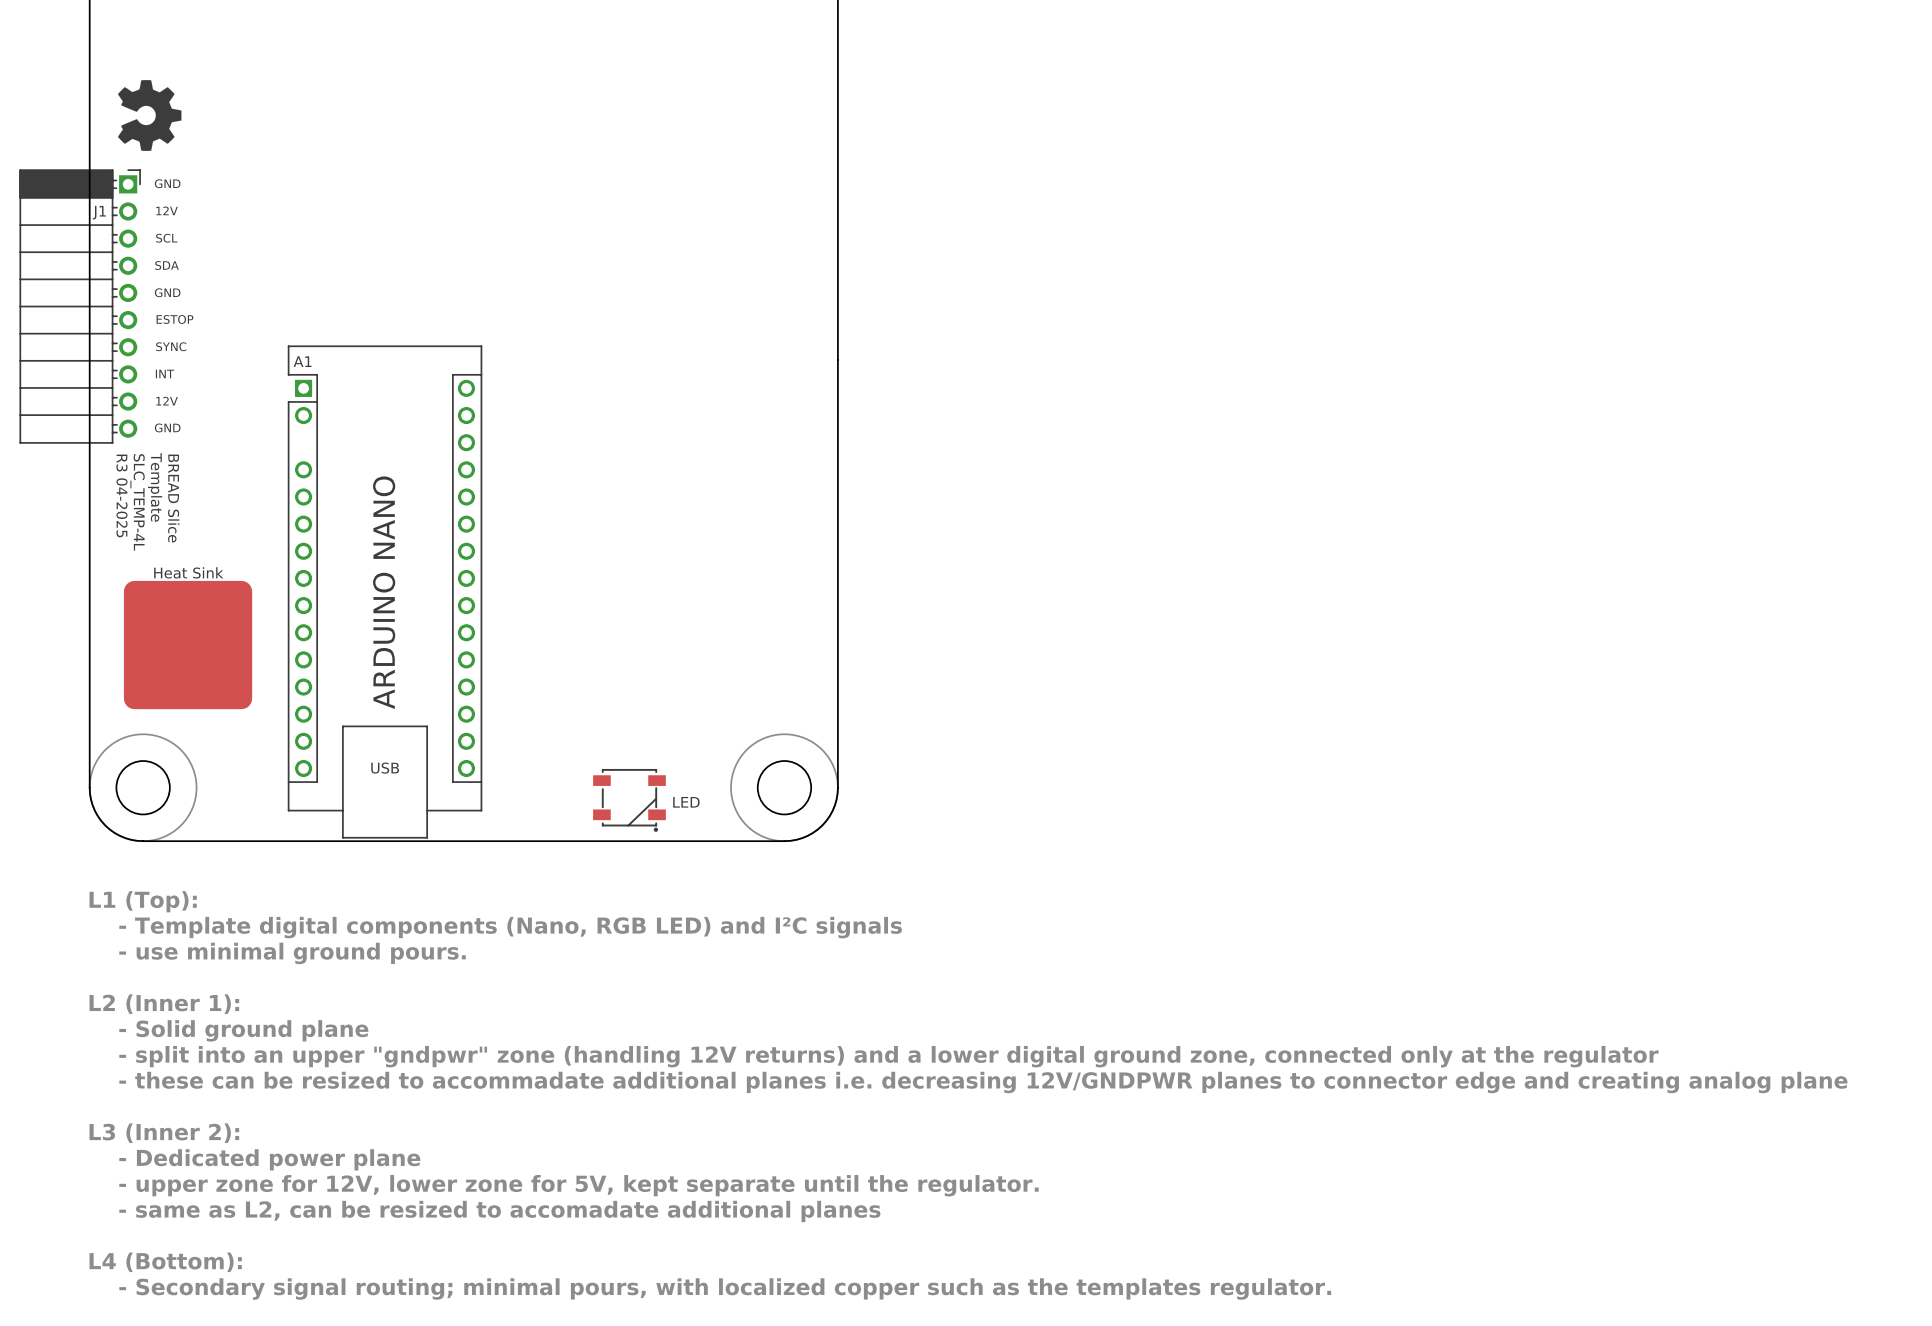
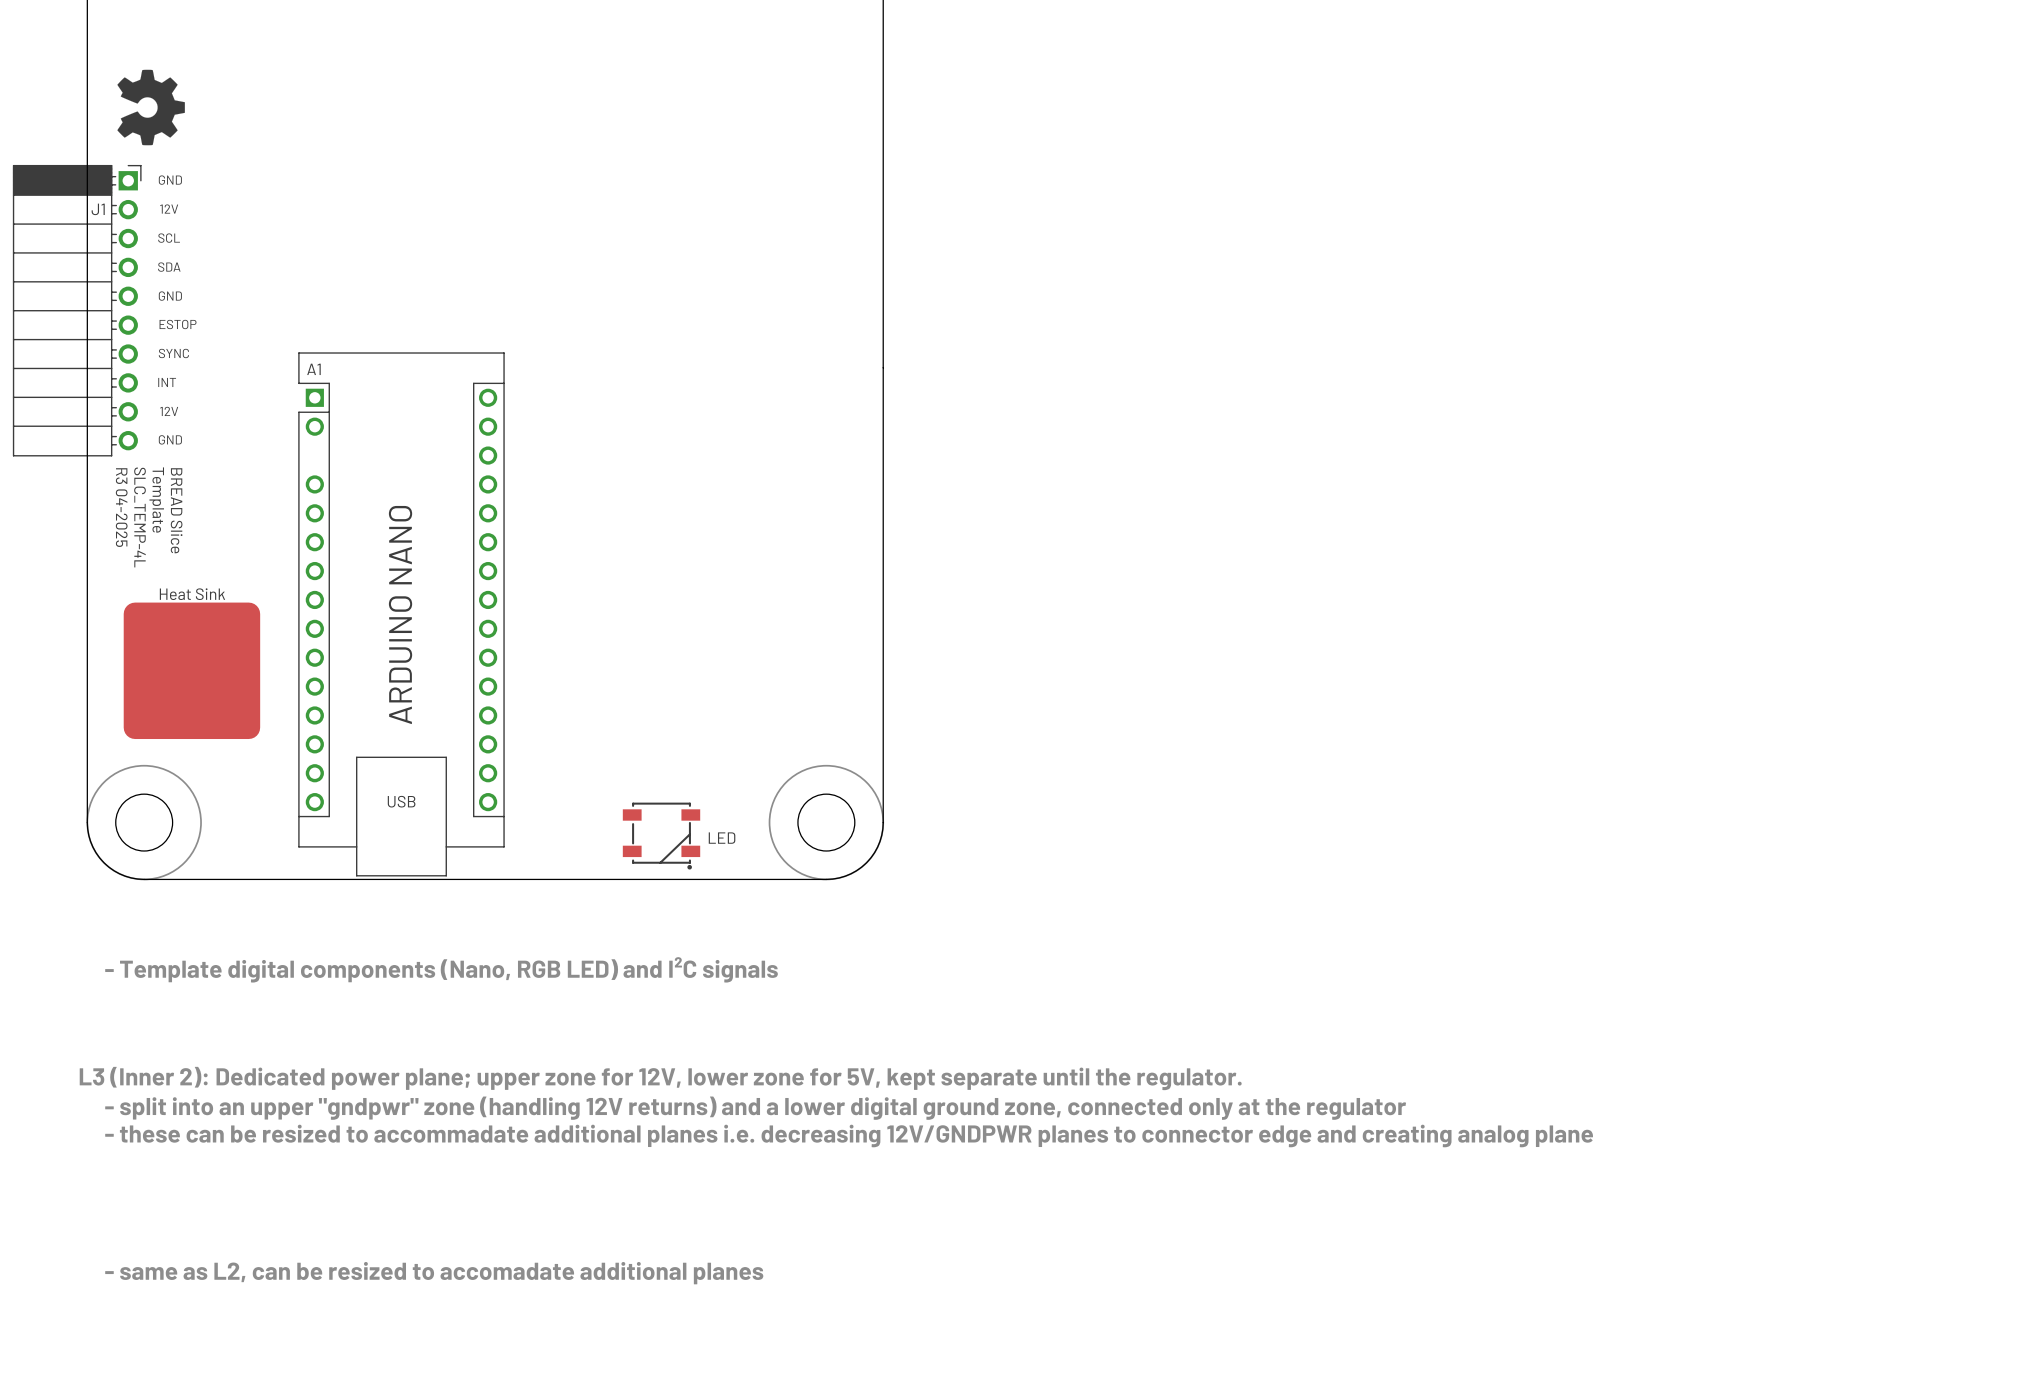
text: L1 (Top): (143, 901) -> none
text: - use minimal ground pours. (292, 953) -> none
text: L2 (Inner 1): (164, 1004) -> none
text: - Solid ground plane (243, 1030) -> L3 (Inner 2): Dedicated power plane; upper zone for 12V, lower zone for 5V, kept separate until the regulator. (660, 1078)
text: L3 (Inner 2): (164, 1133) -> none
text: - Dedicated power plane (269, 1159) -> none
text: - upper zone for 12V, lower zone for 5V, kept separate until the regulator. (578, 1185) -> none
text: L4 (Bottom): (165, 1262) -> none
text: - Secondary signal routing; minimal pours, with localized copper such as the templates regulator. (725, 1289) -> none

